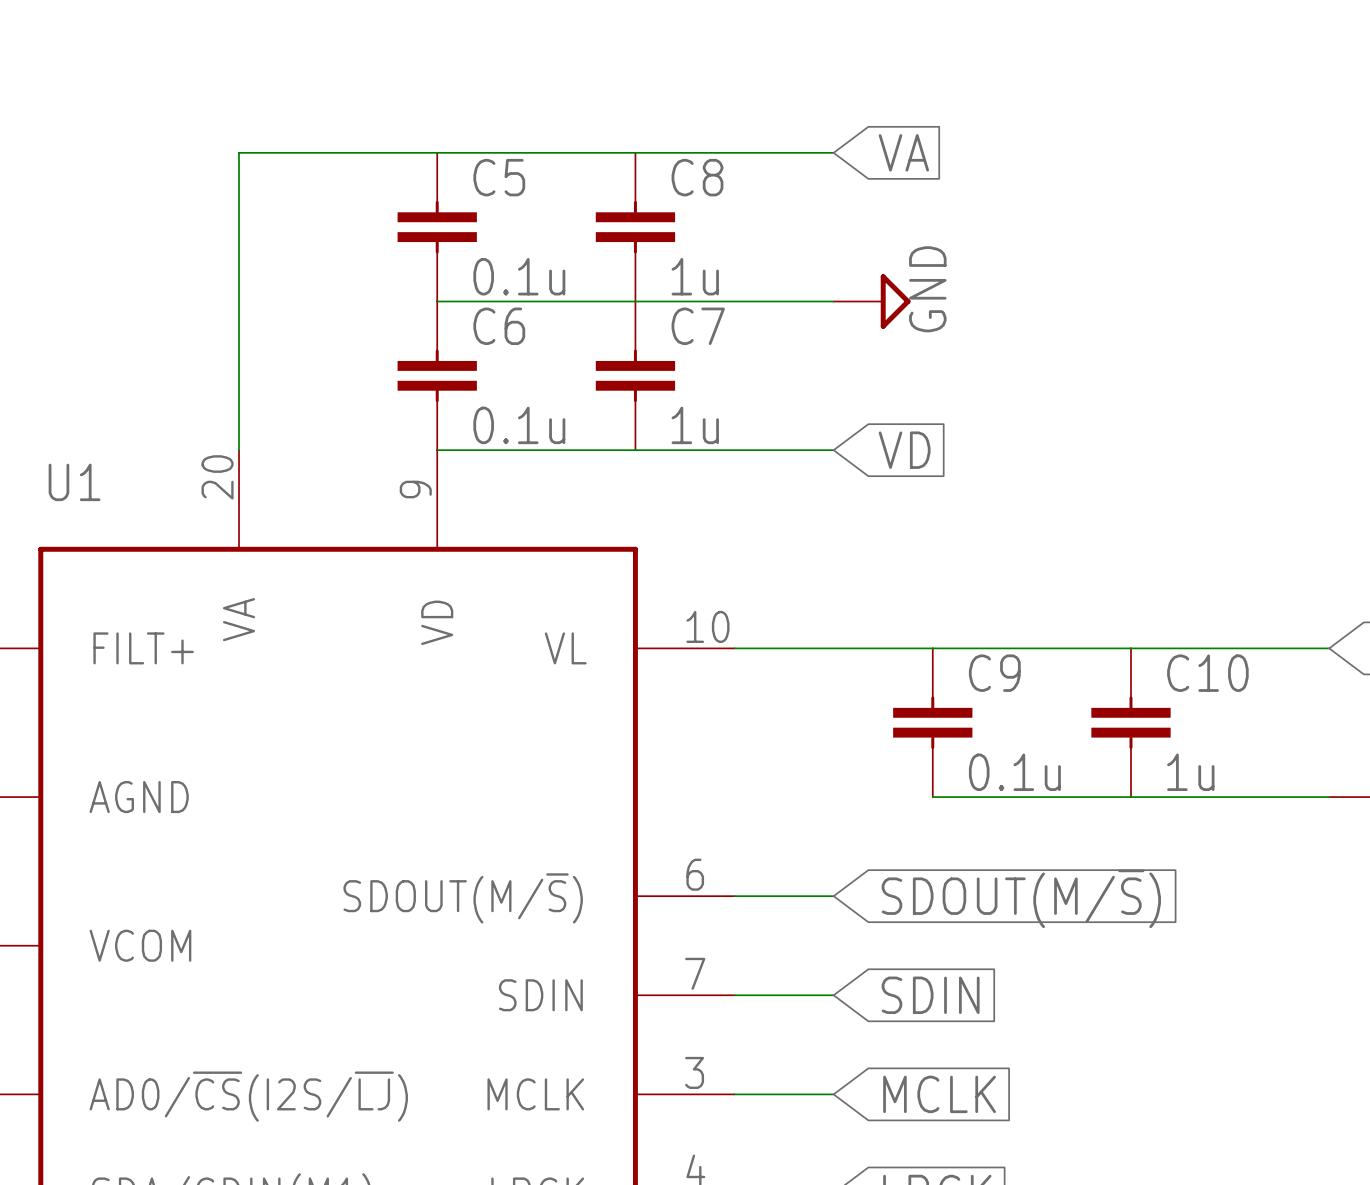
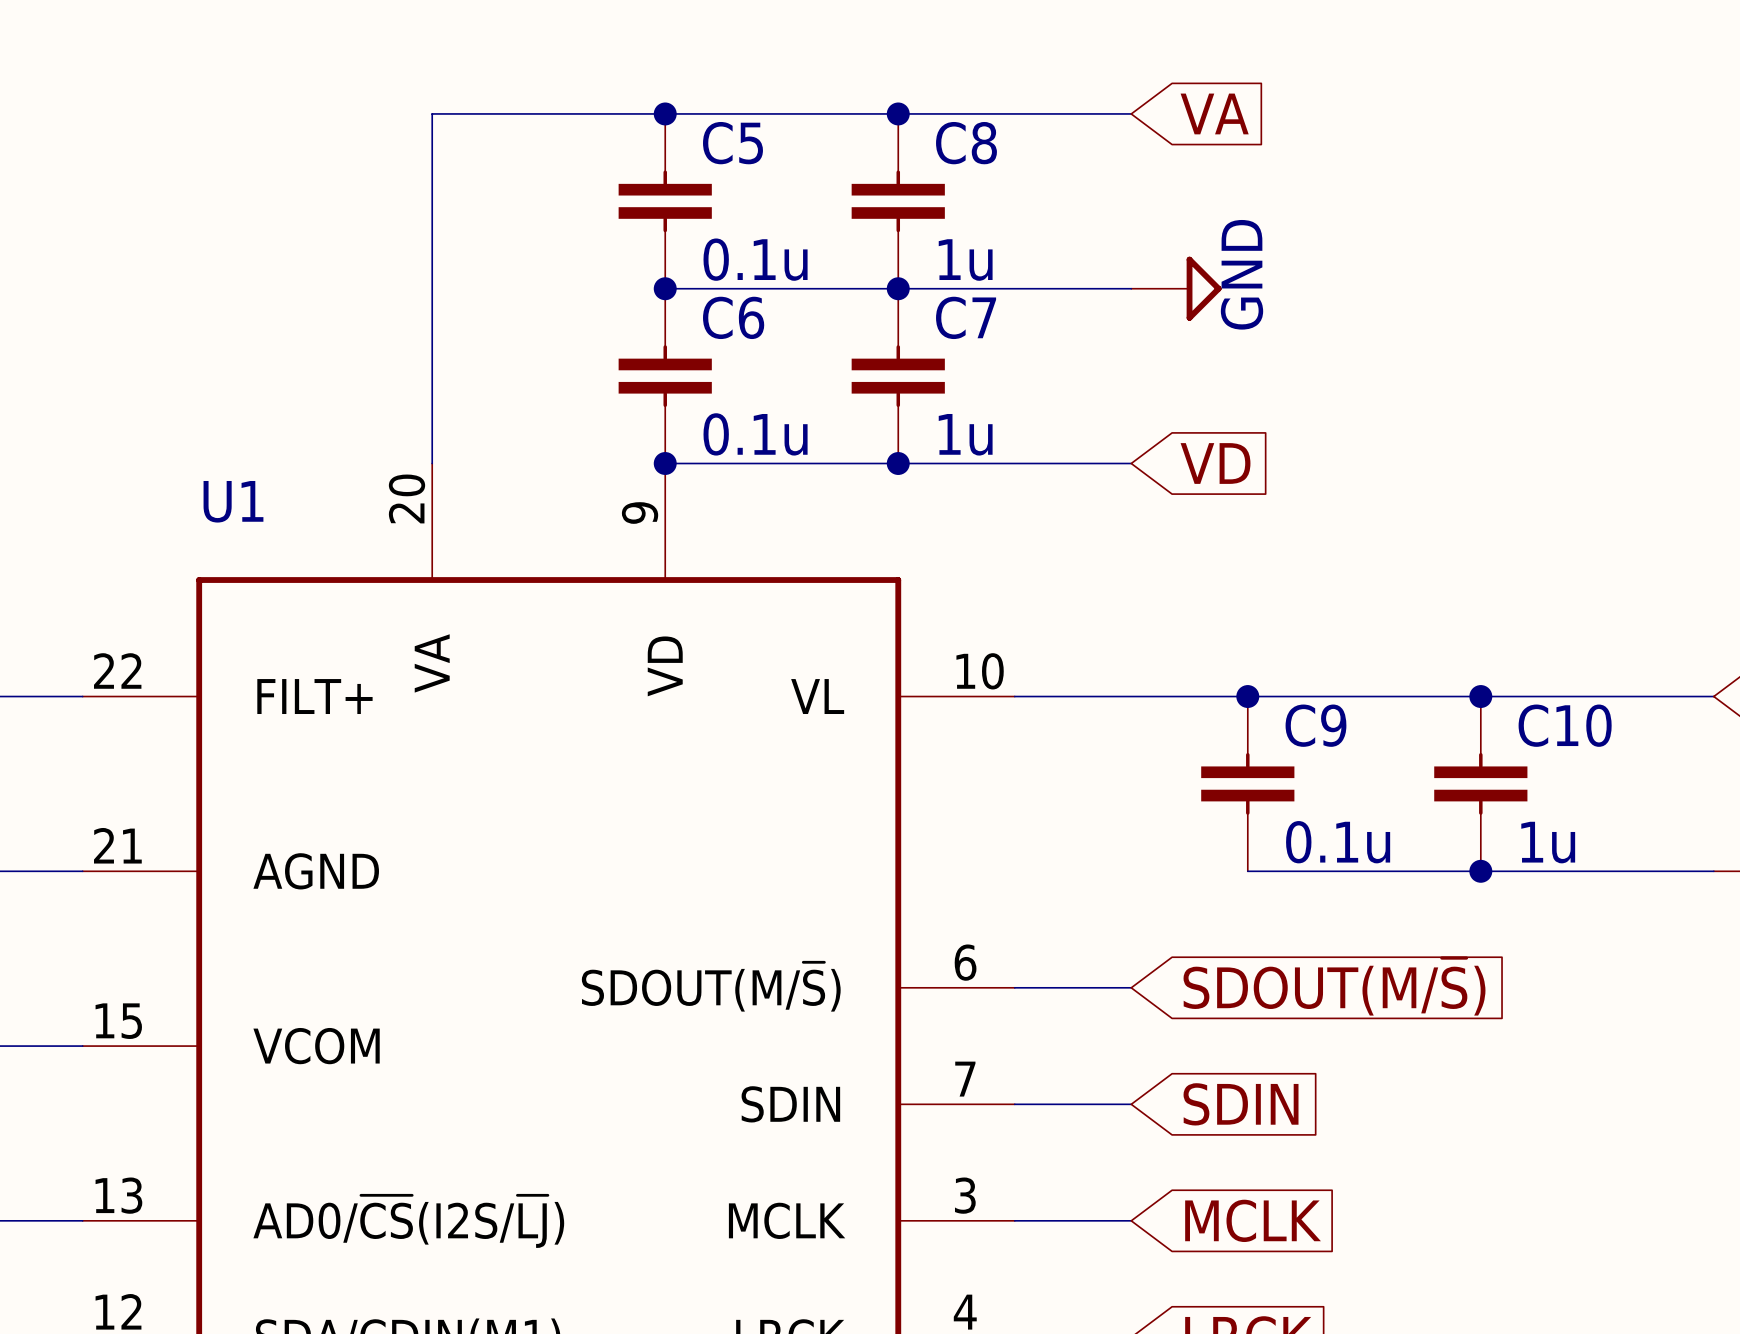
junction: none -> (665, 113)
junction: none -> (898, 113)
junction: none -> (665, 288)
junction: none -> (898, 288)
junction: none -> (665, 463)
junction: none -> (898, 463)
junction: none -> (1247, 696)
junction: none -> (1480, 696)
junction: none -> (1480, 871)

